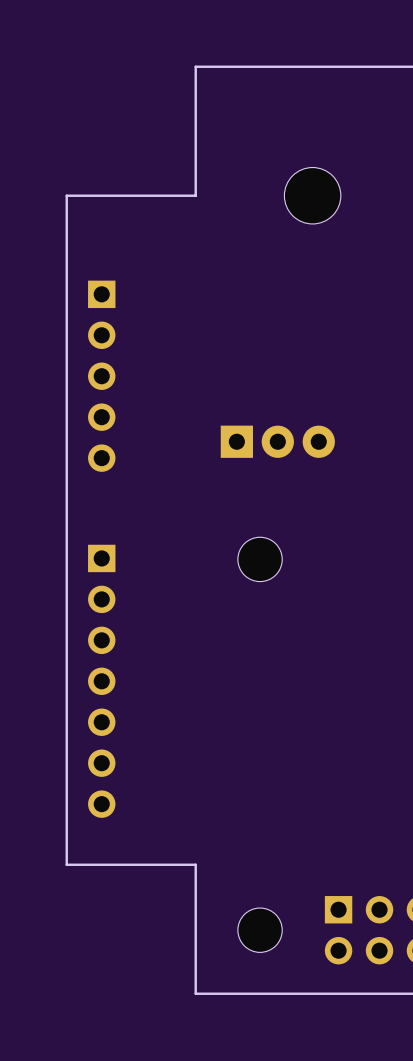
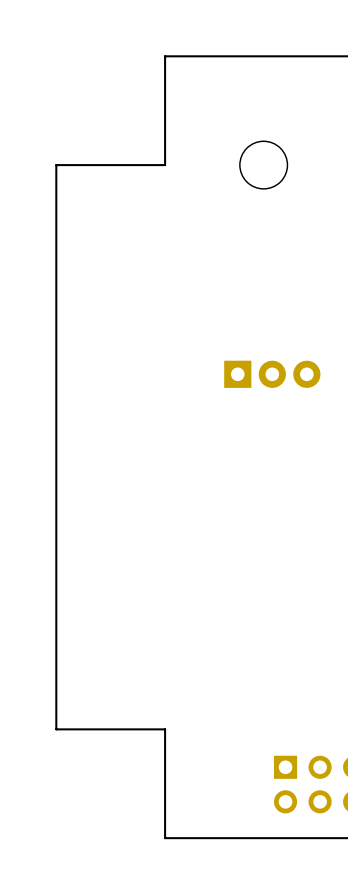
part: (101, 376) -> none
part position: (277, 441) -> (272, 374)
part: (260, 559) -> none
part: (101, 681) -> none
part: (260, 930) -> none

